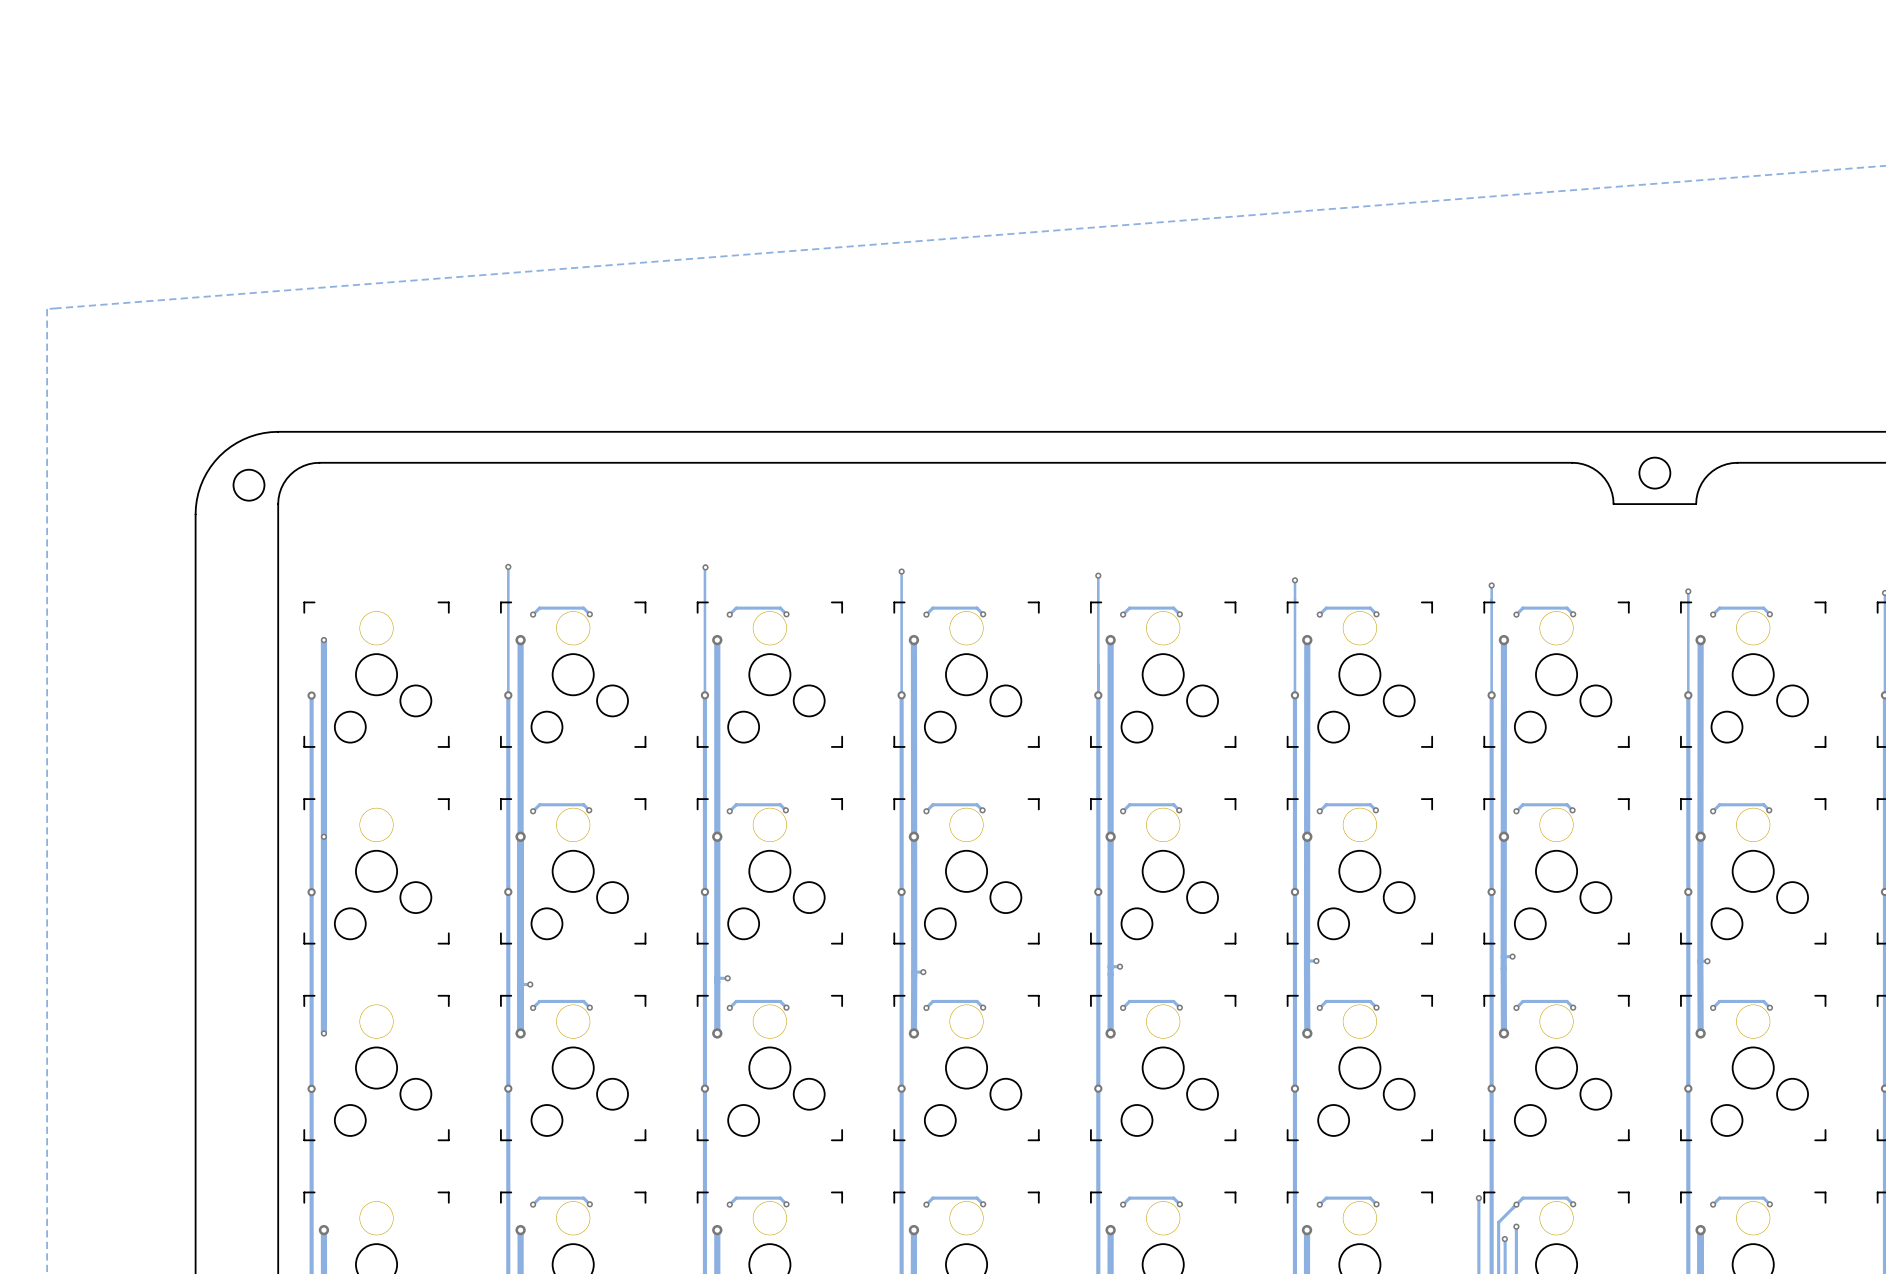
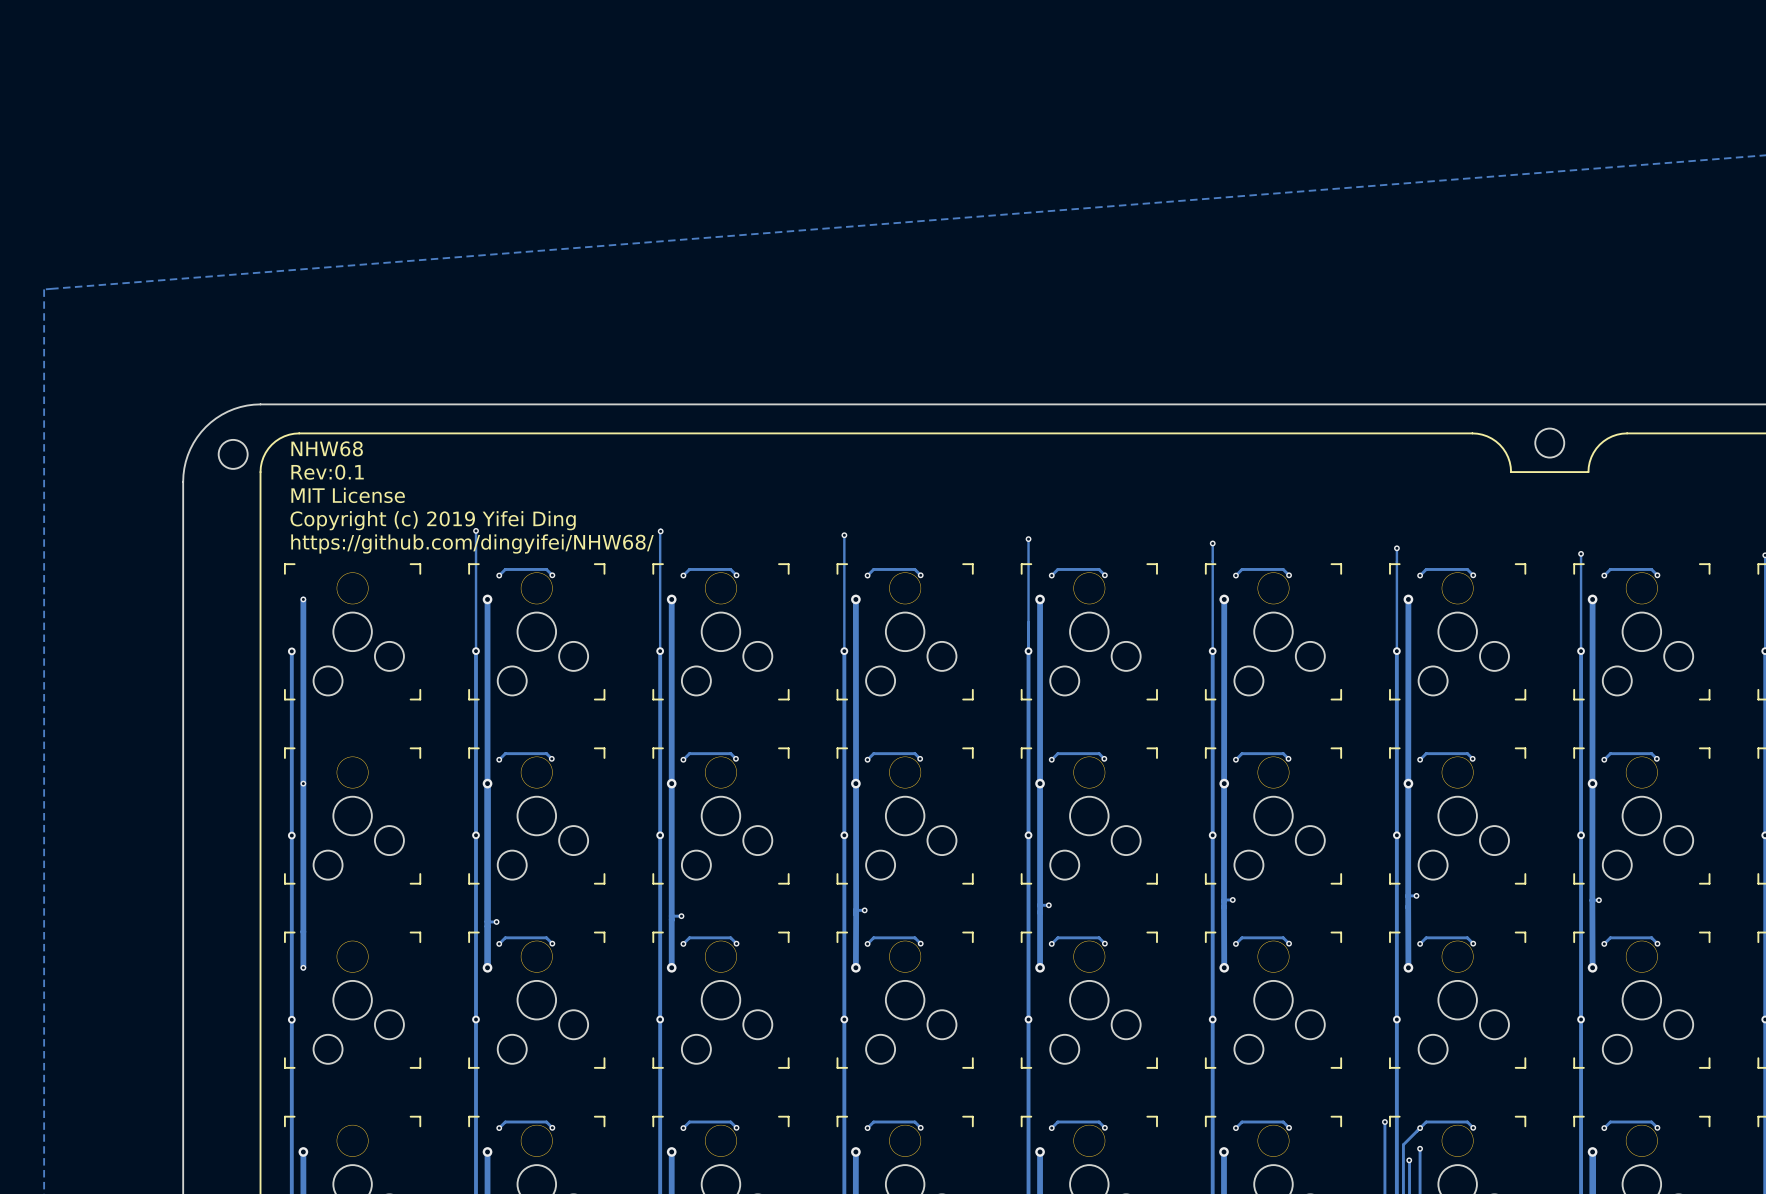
text: none -> NHW68 (327, 448)
text: none -> Rev:0.1 (327, 472)
text: none -> MIT License (348, 495)
text: none -> Copyright (c) 2019 Yifei Ding (433, 520)
text: none -> https://github.com/dingyifei/NHW68/ (472, 544)

